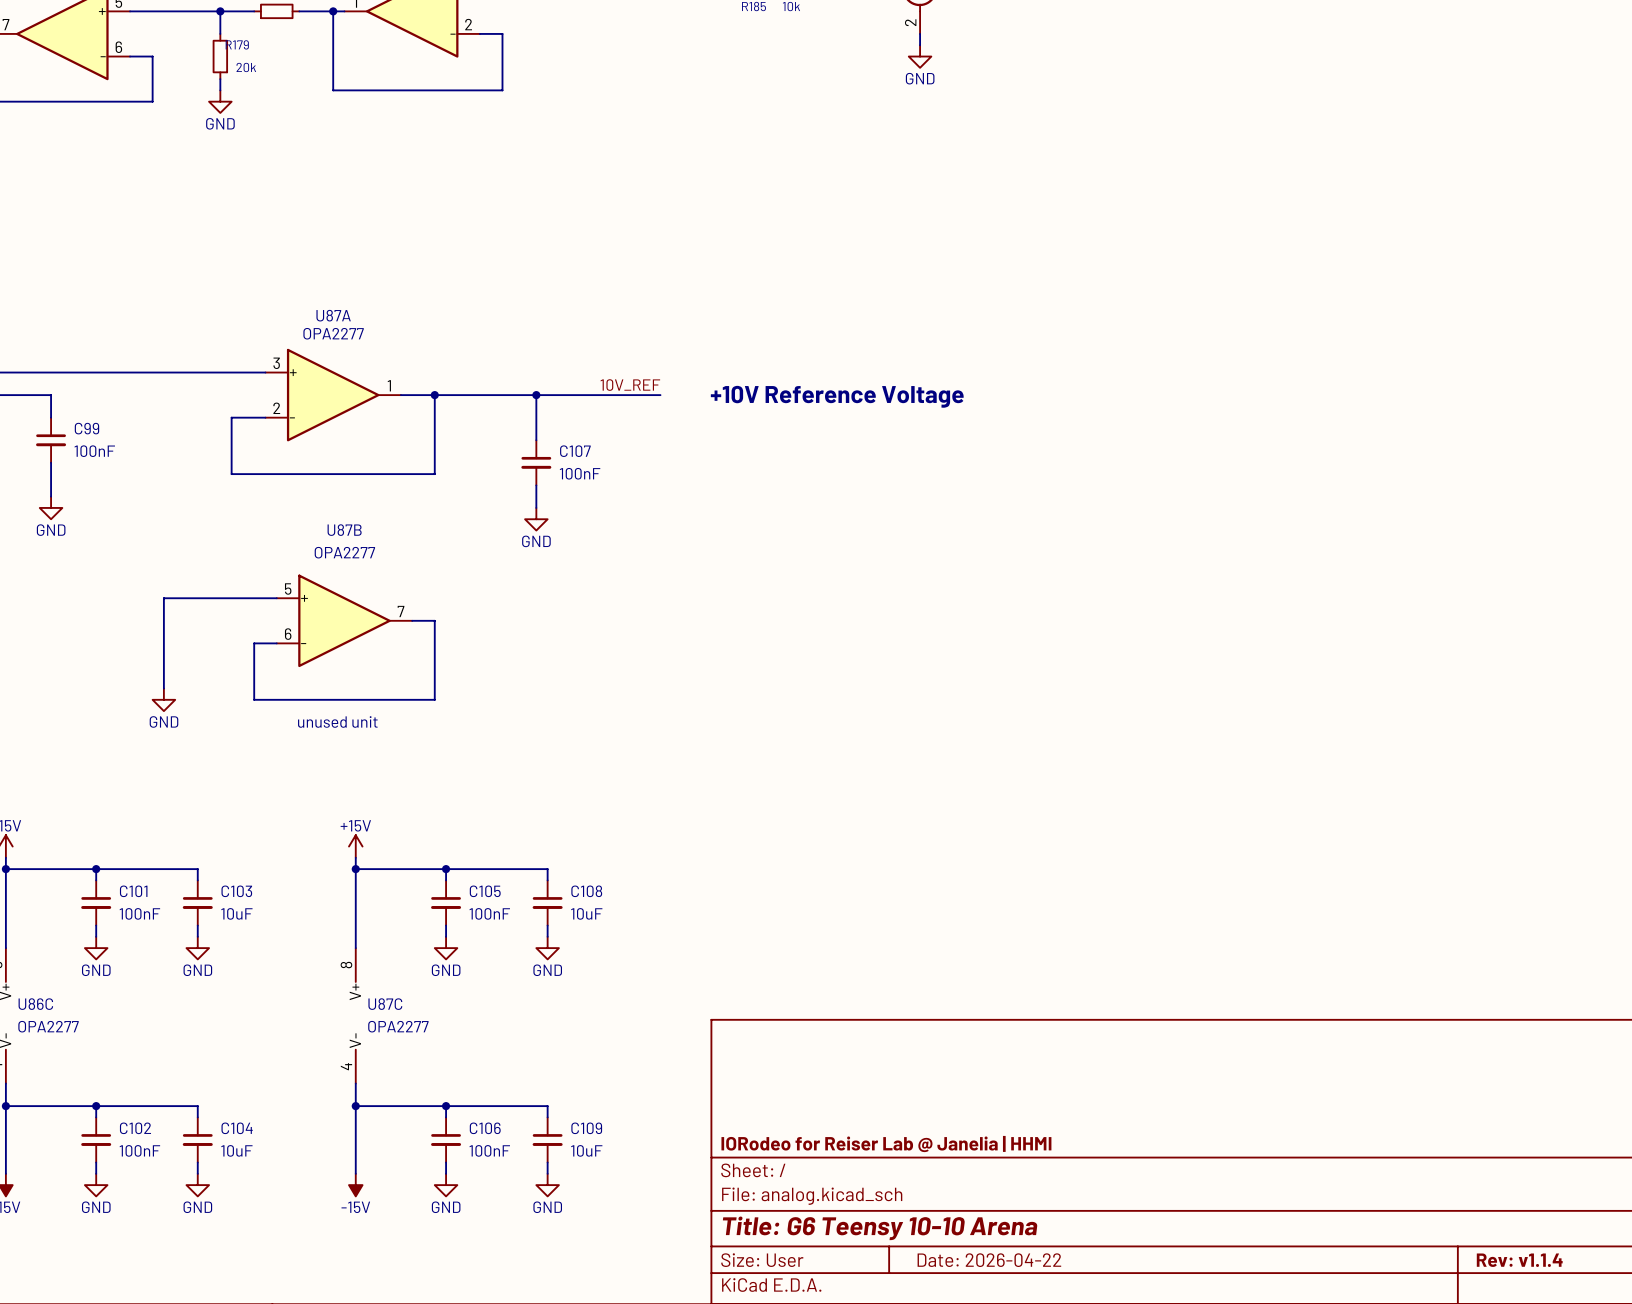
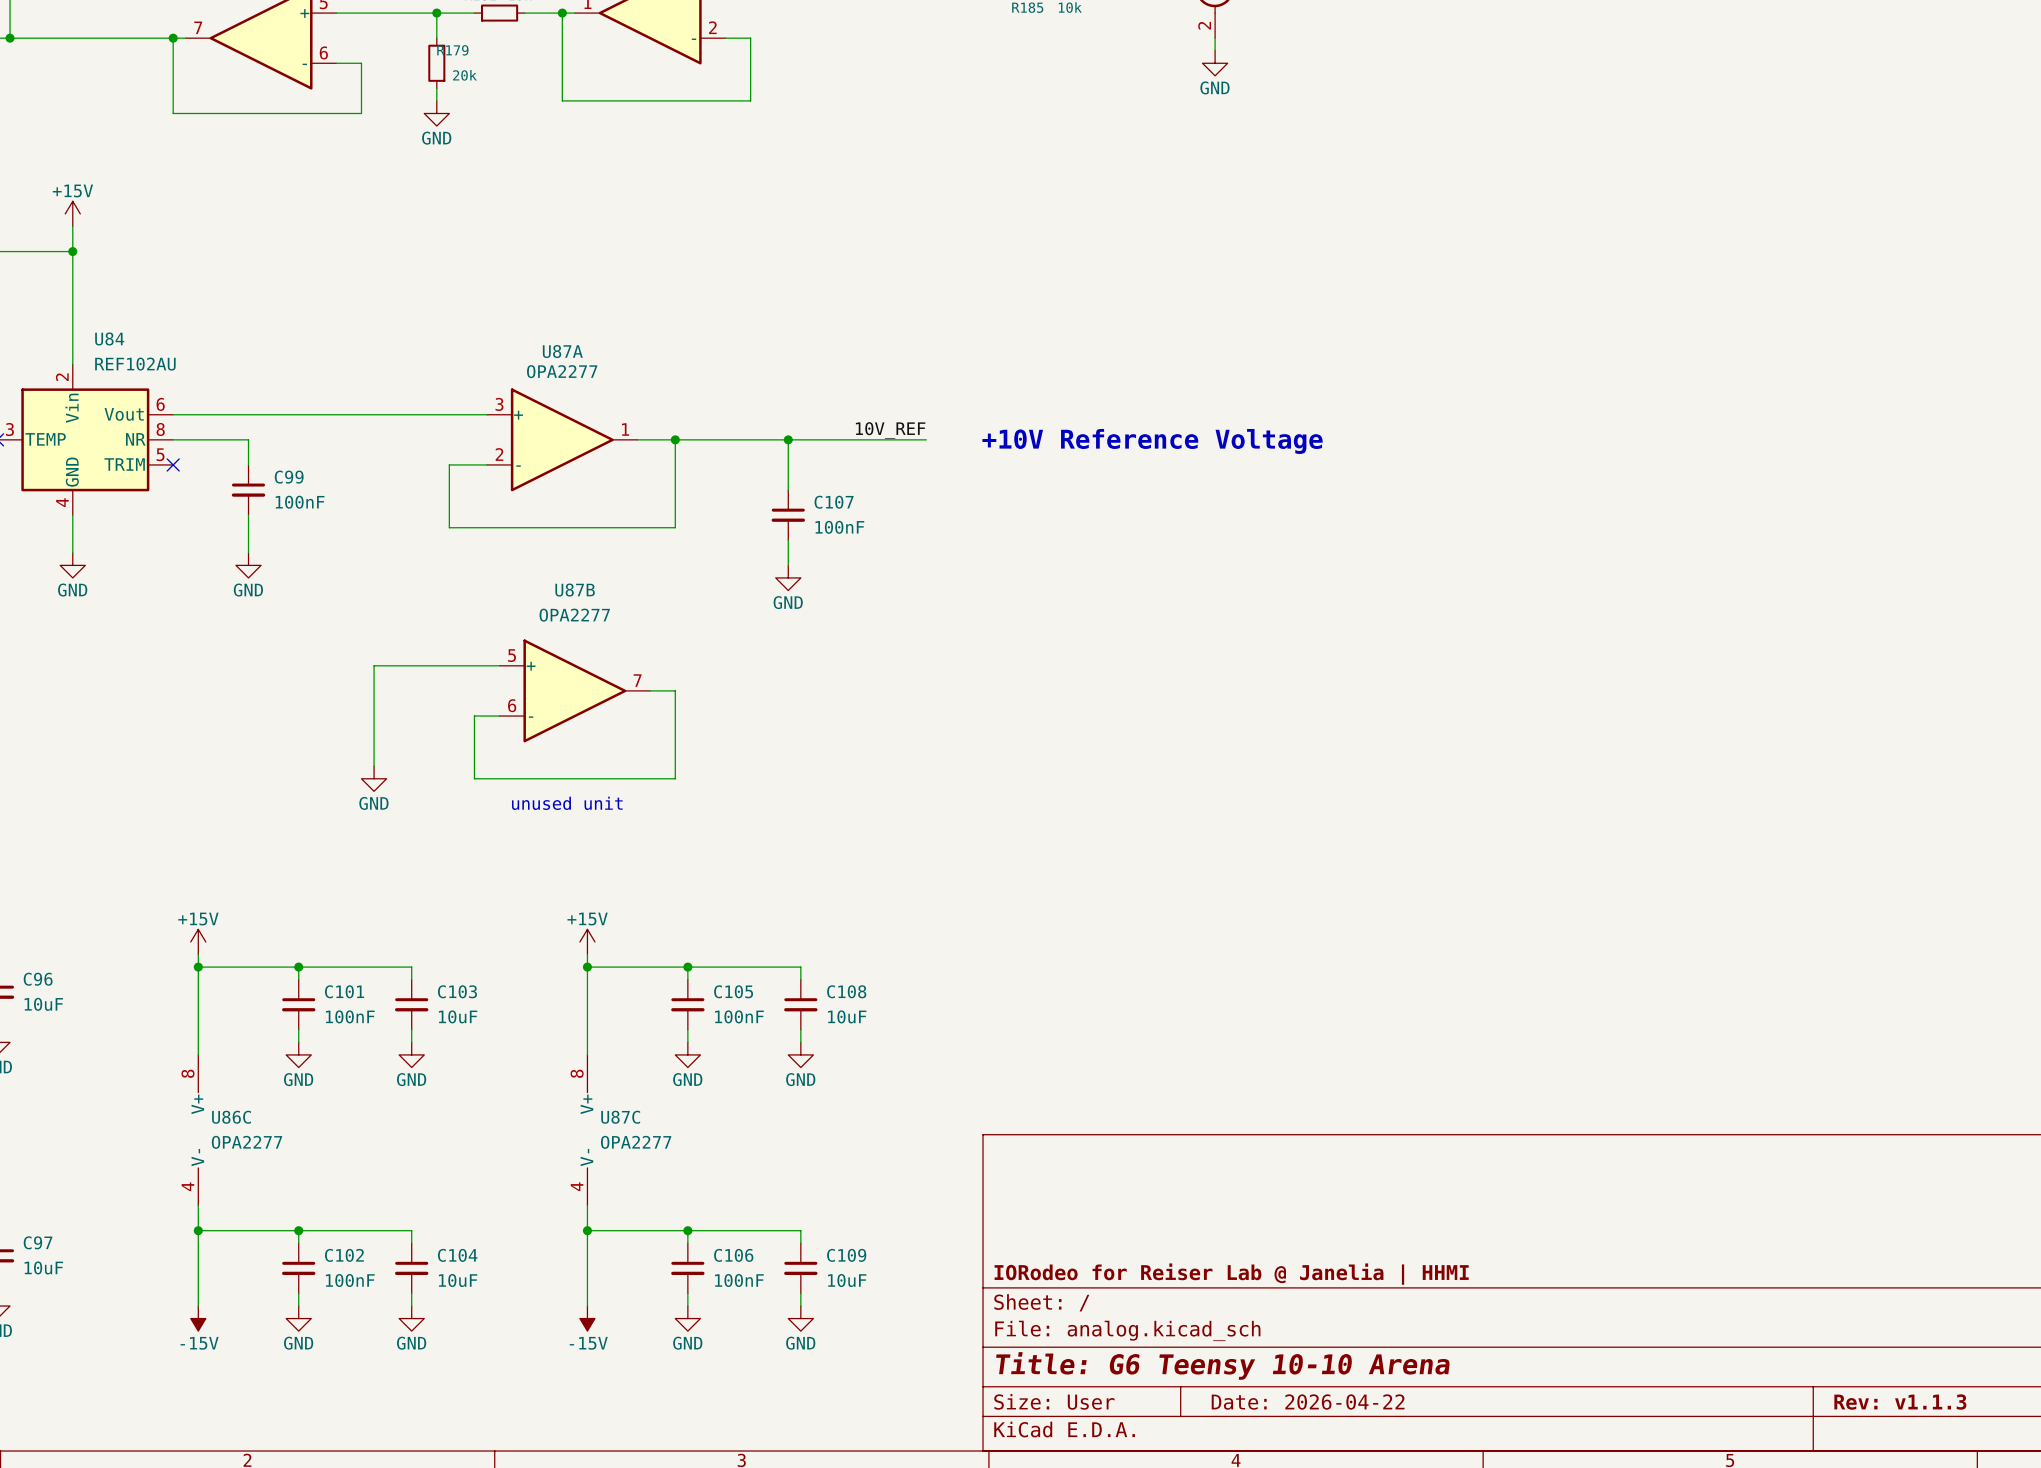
title block: Rev: v1.1.4 (1519, 1260) -> Rev: v1.1.3 (1900, 1402)

